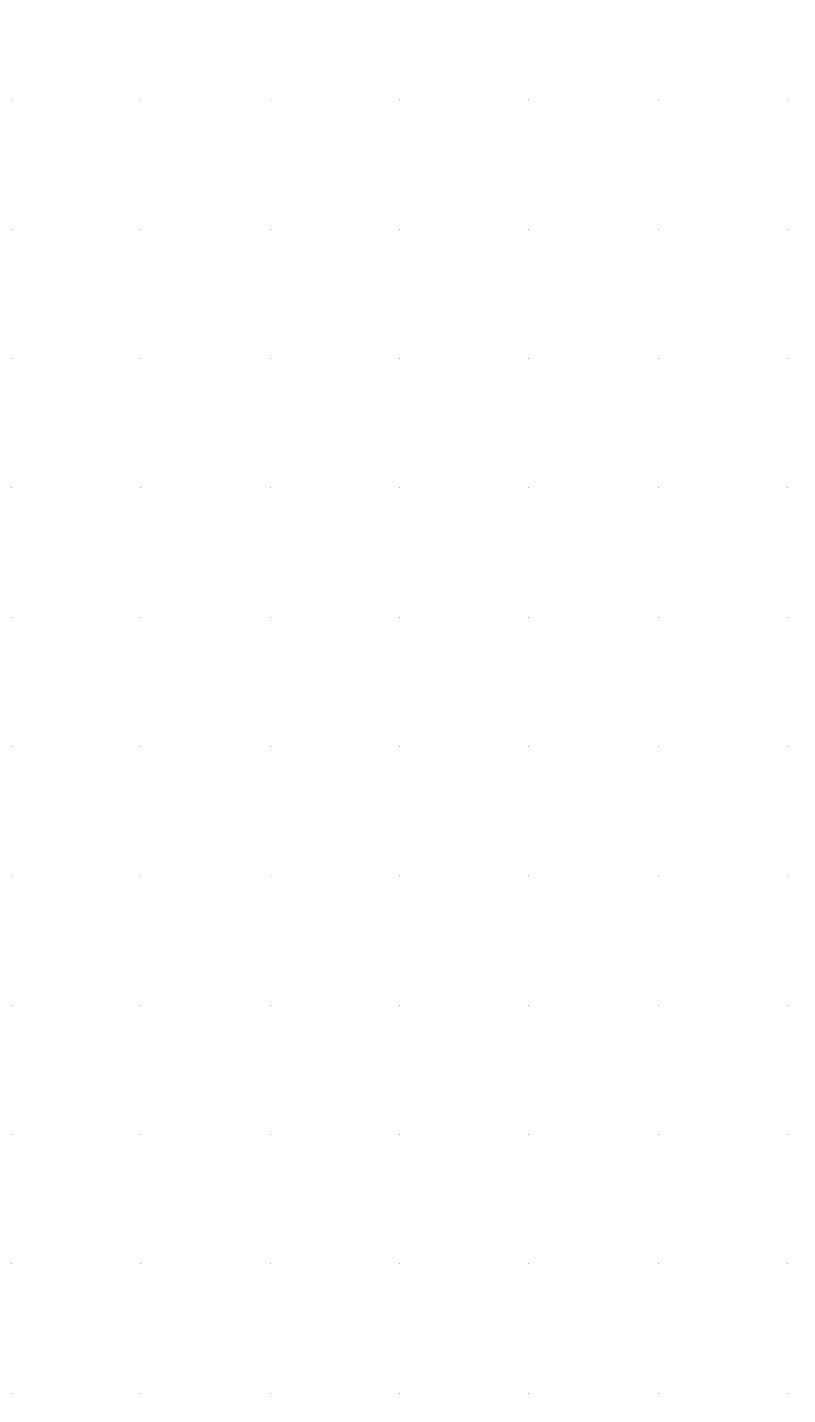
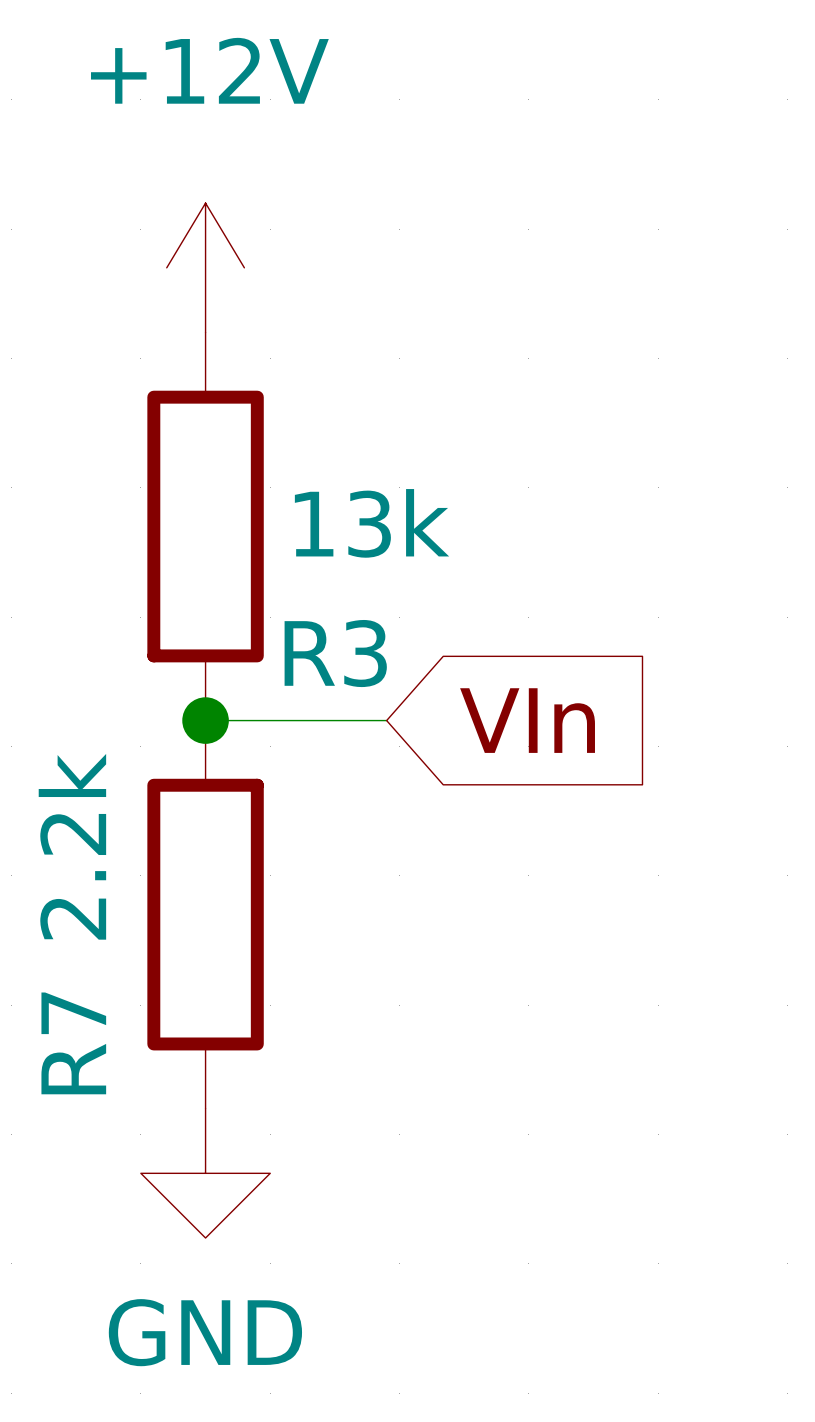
power symbol: none -> +12V (205, 267)
R3: none -> 13k (205, 526)
wire: none -> (205, 720) (386, 720)
junction: none -> (205, 720)
global label: none -> VIn (527, 720)
R7: none -> 2.2k (205, 914)
power symbol: none -> GND (205, 1173)

